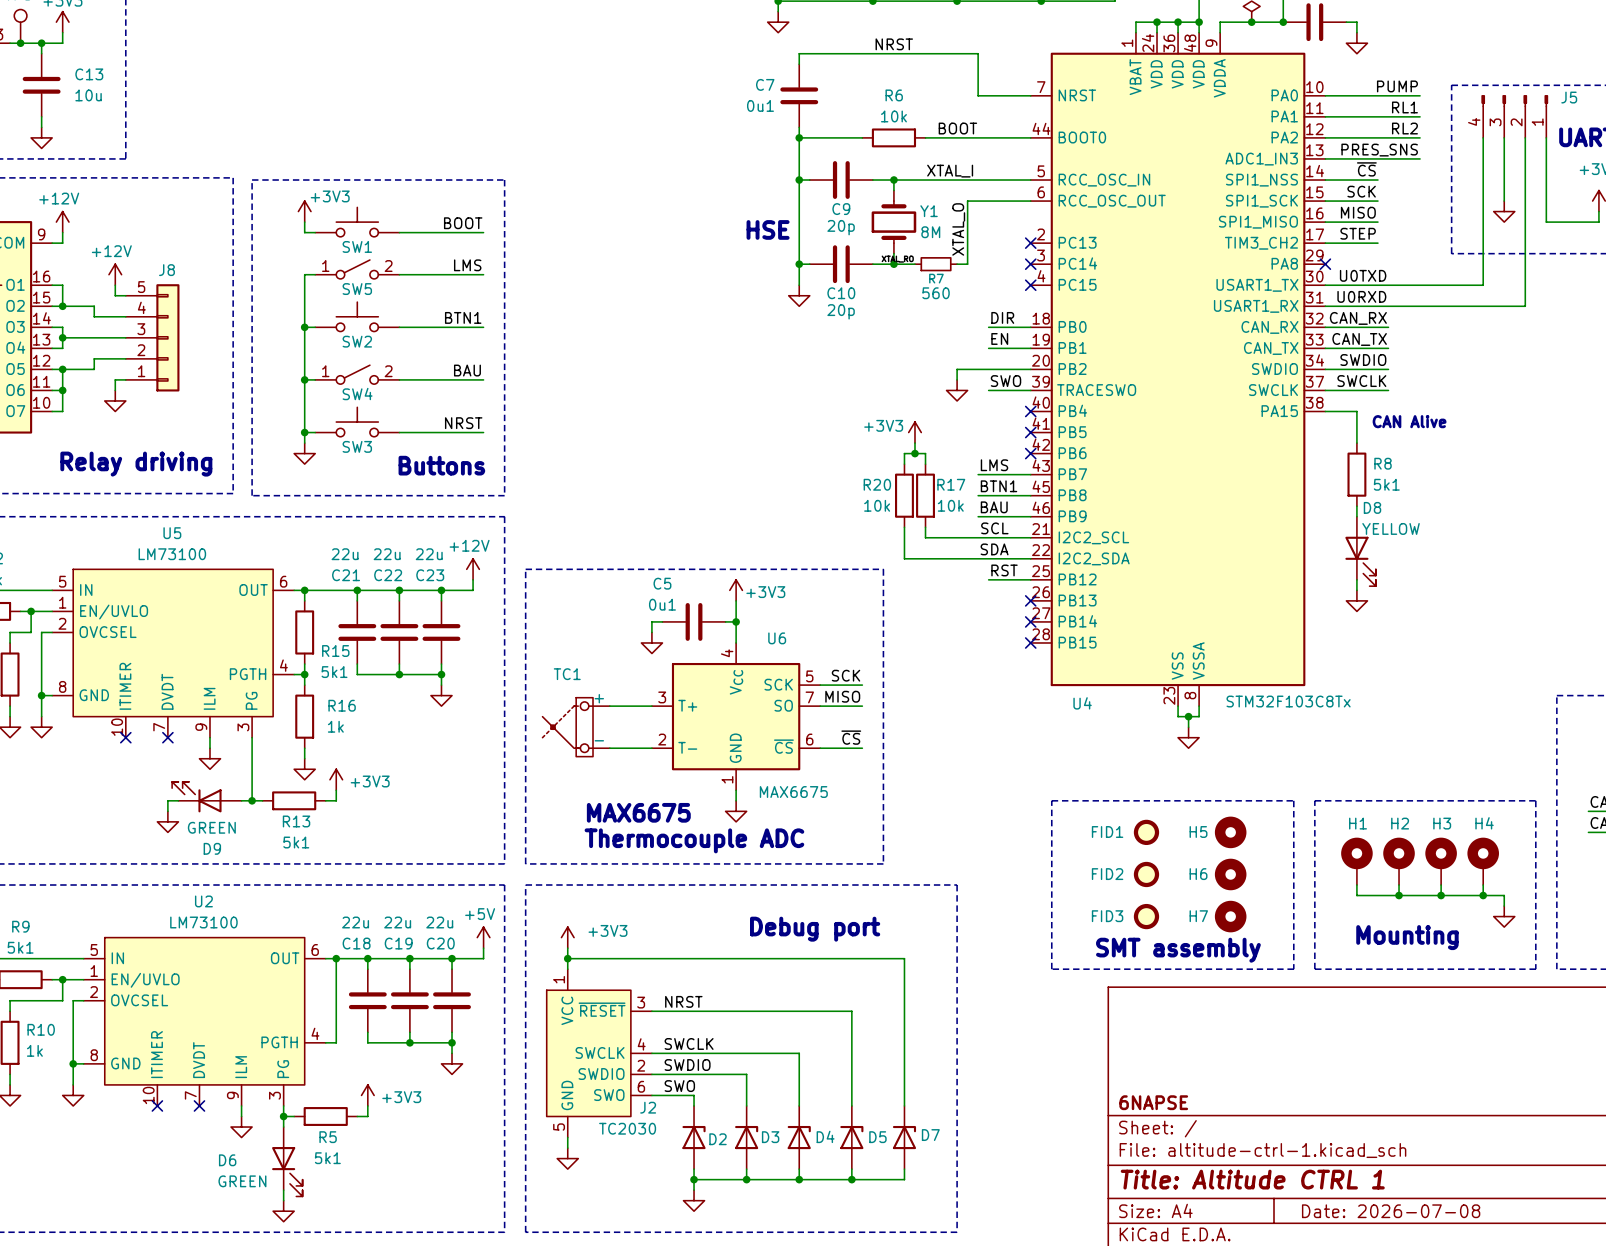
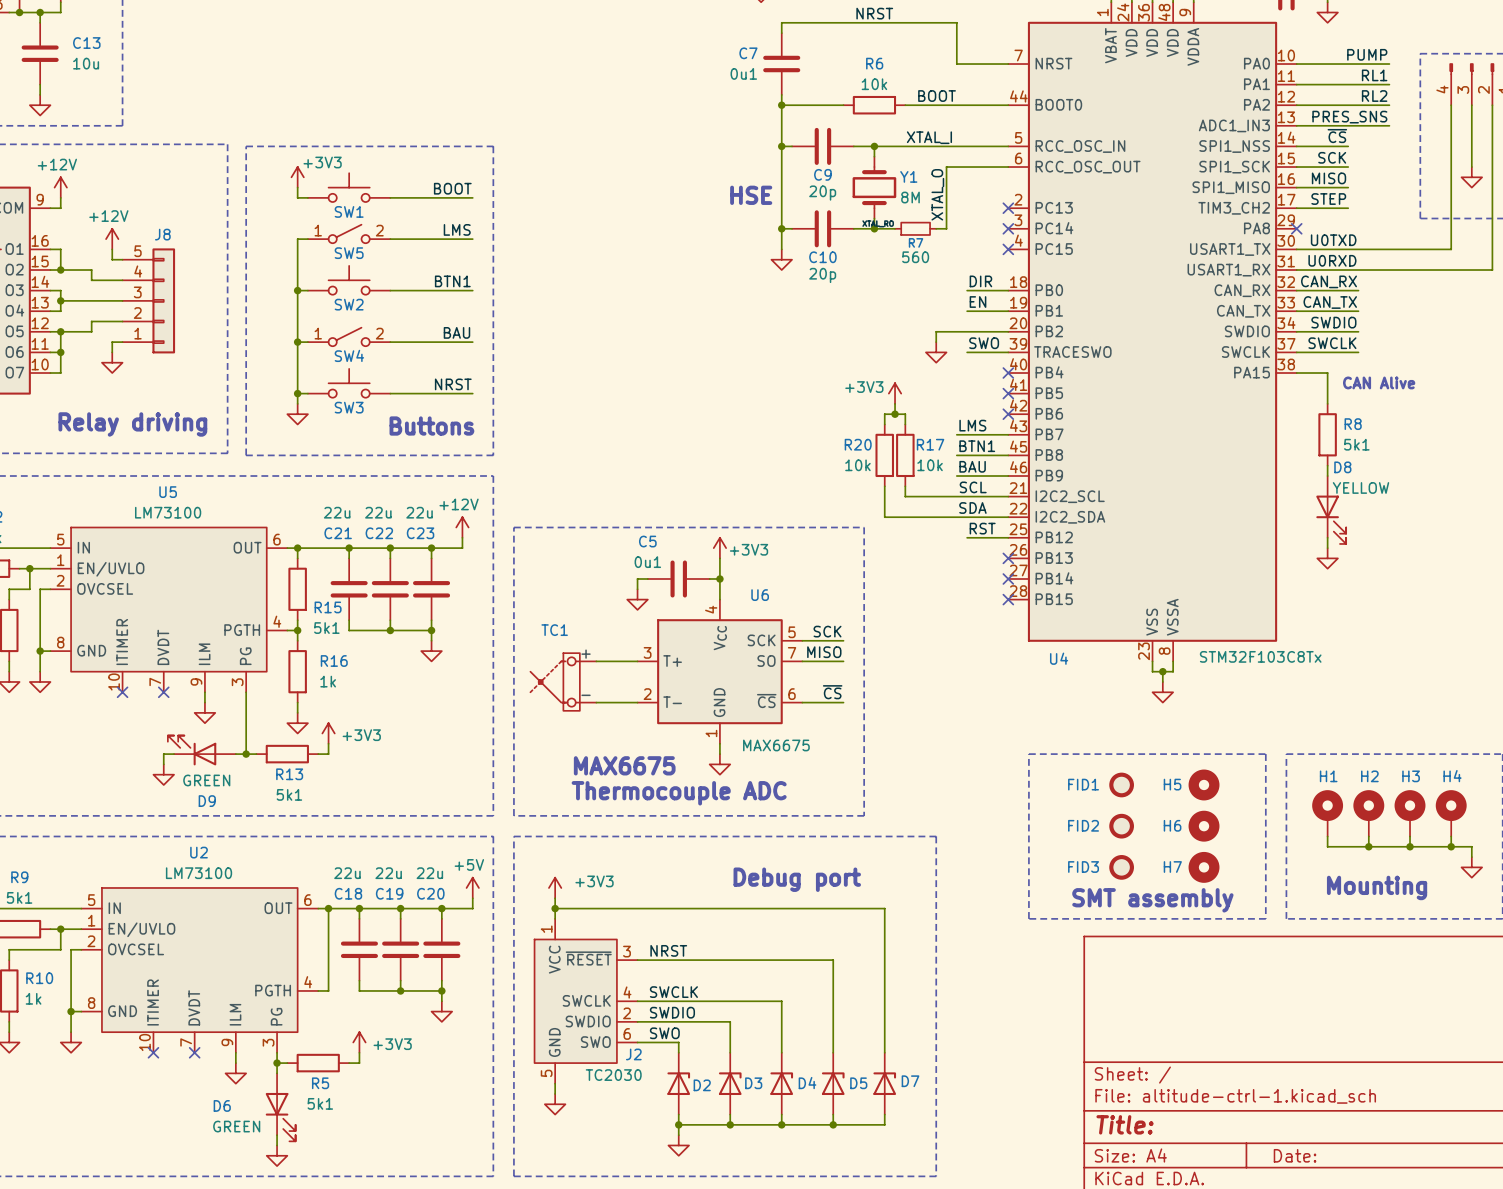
title block: 6NAPSE (1153, 1102) -> none
title block: Title: Altitude CTRL 1 (1252, 1179) -> Title: (1125, 1124)
title block: Date: 2026-07-08 (1391, 1211) -> Date: (1295, 1155)

